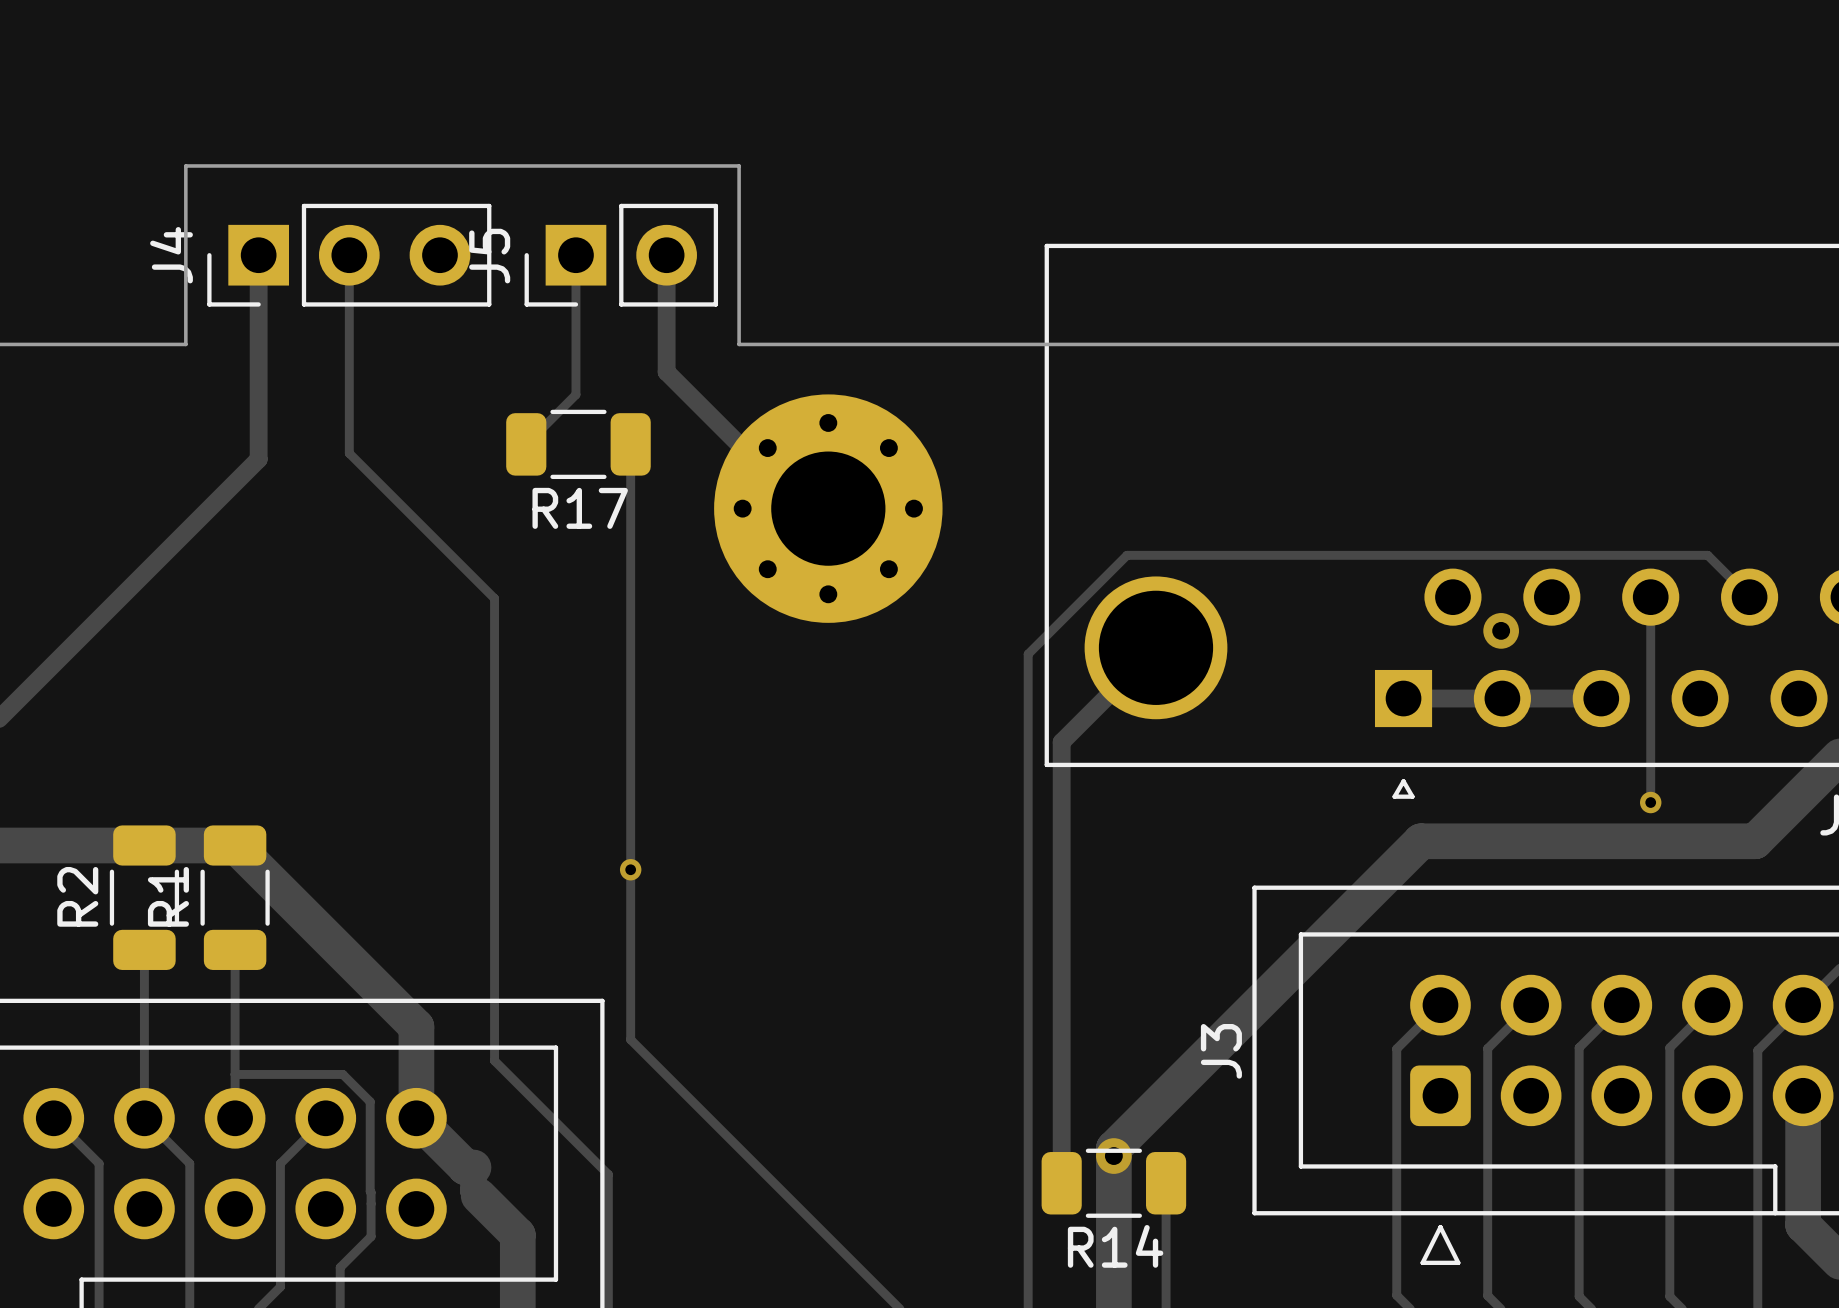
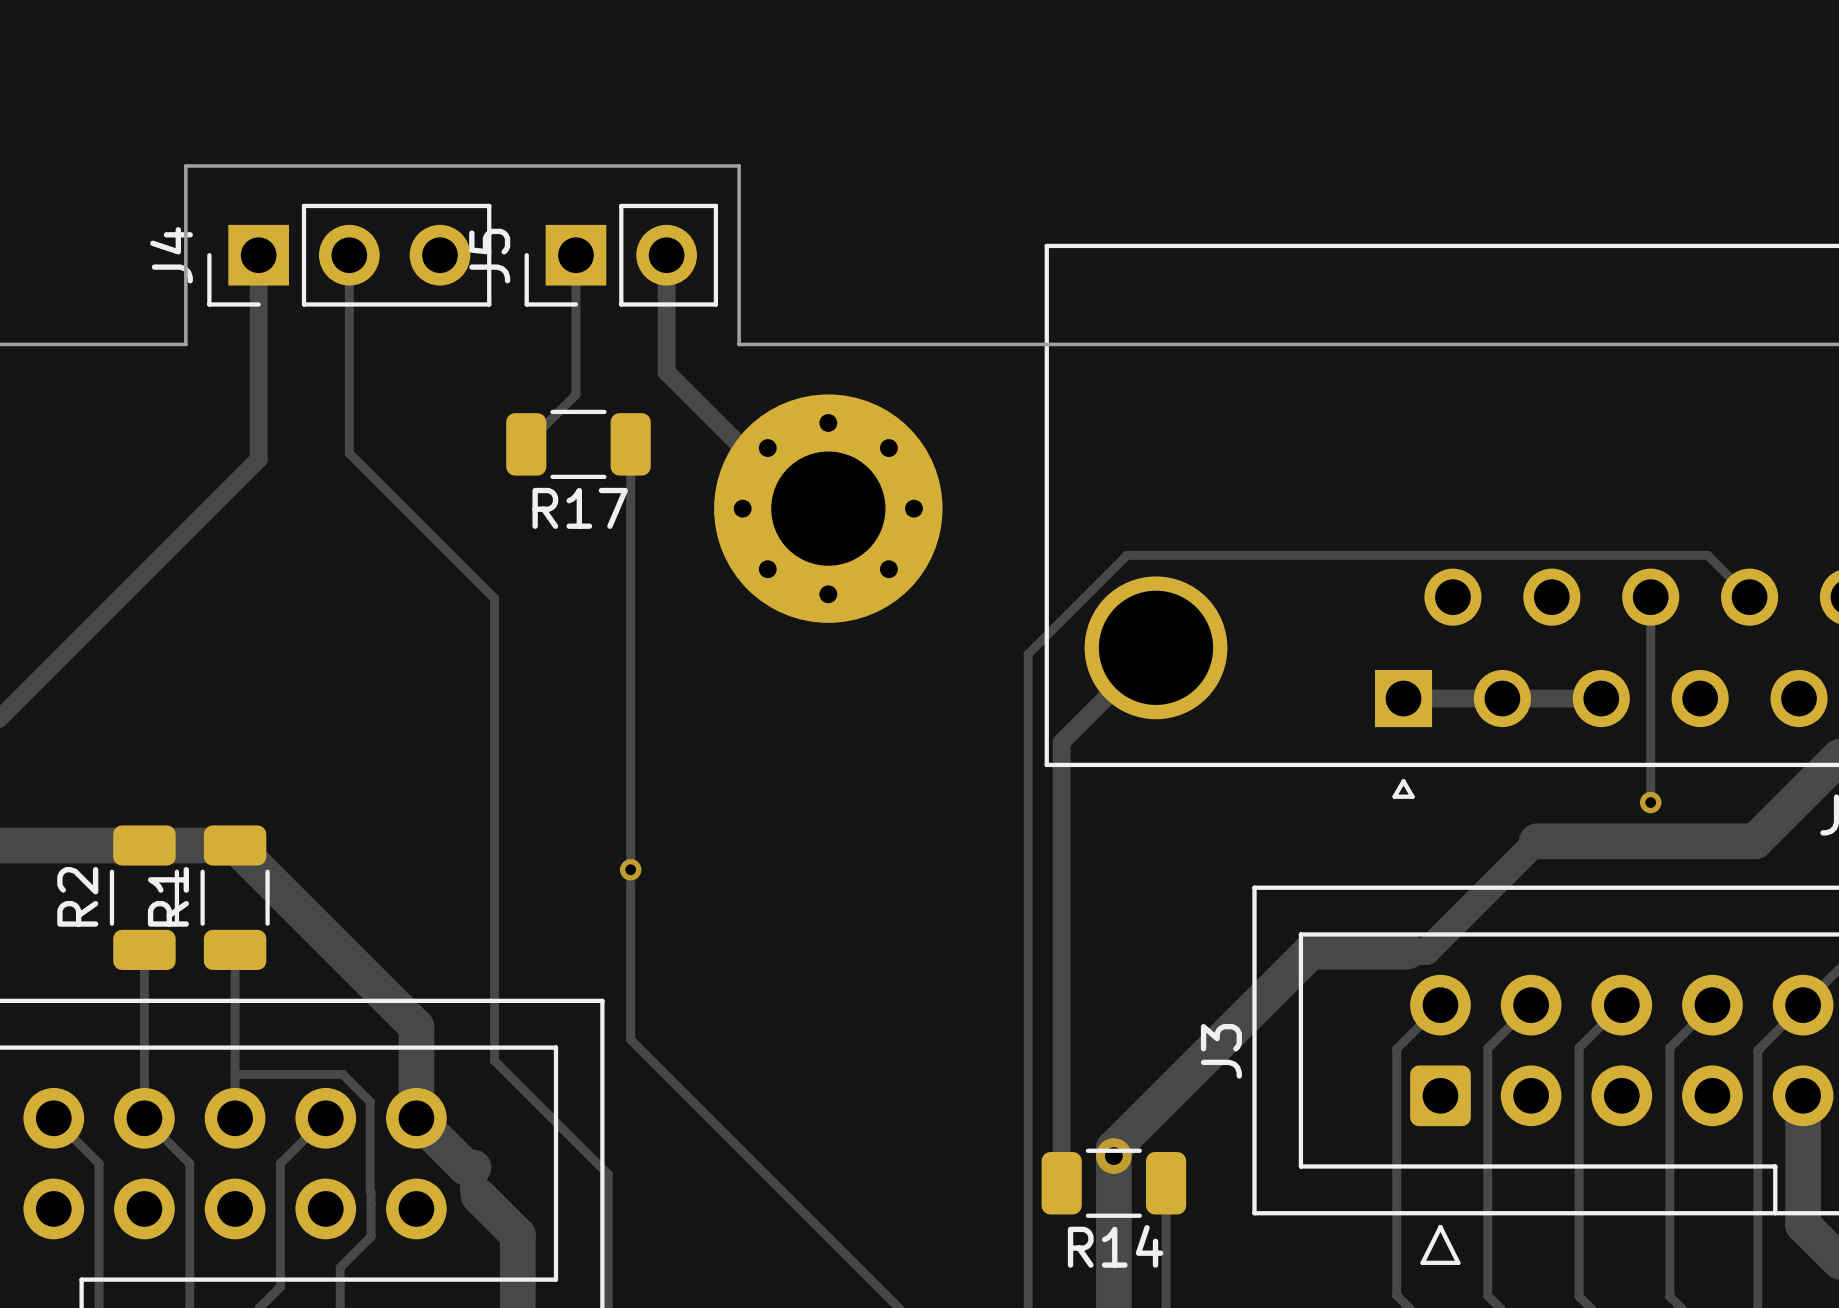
via: (1501, 630) -> none
track: (1536, 841) (1420, 841) (1310, 951) -> (1536, 841) (1426, 951) (1310, 951)

